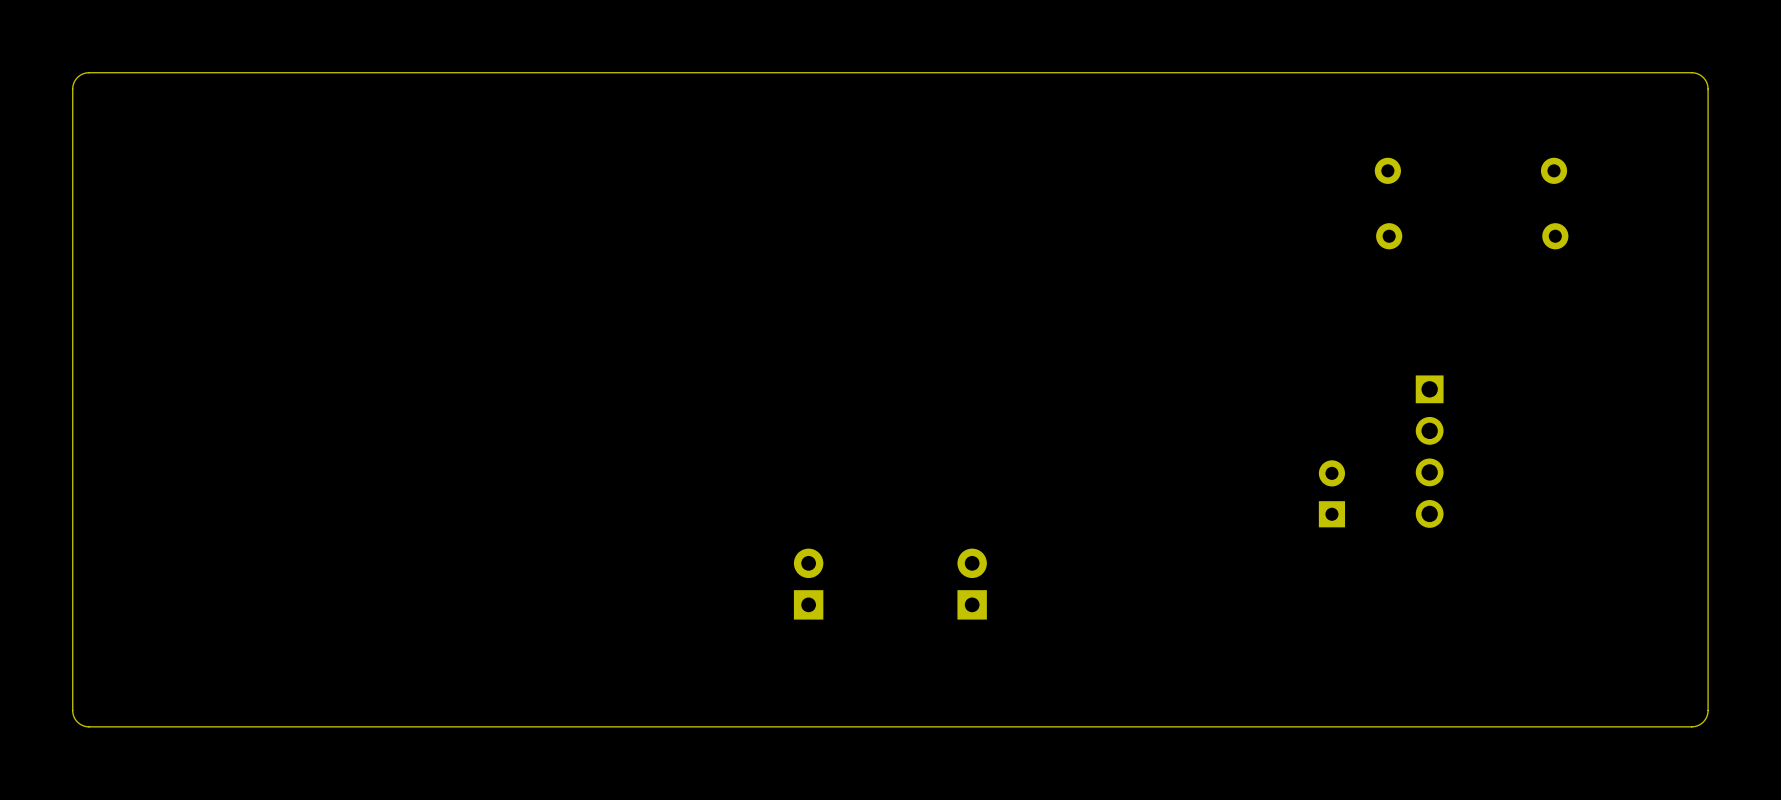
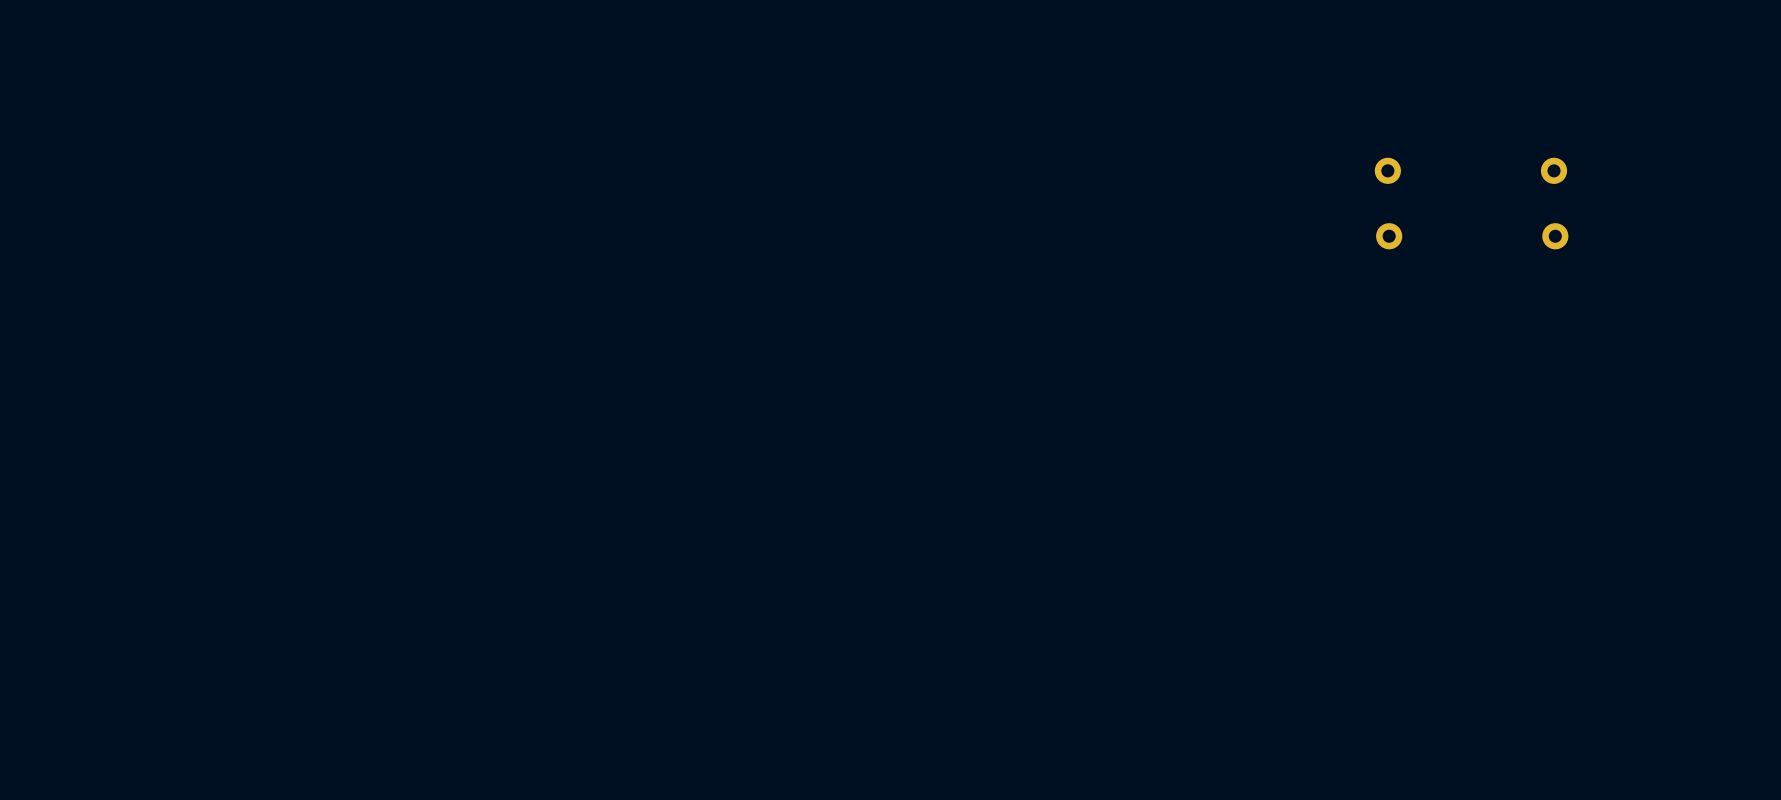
board edge: (1691, 72) (83, 73) (76, 78) (72, 89) (73, 715) (78, 723) (89, 726) (1697, 725) (1704, 720) (1708, 710) (1708, 89) (1703, 77) (1691, 72) -> none
part: (1429, 451) -> none
part: (1331, 493) -> none
part: (808, 584) -> none
part: (972, 584) -> none

